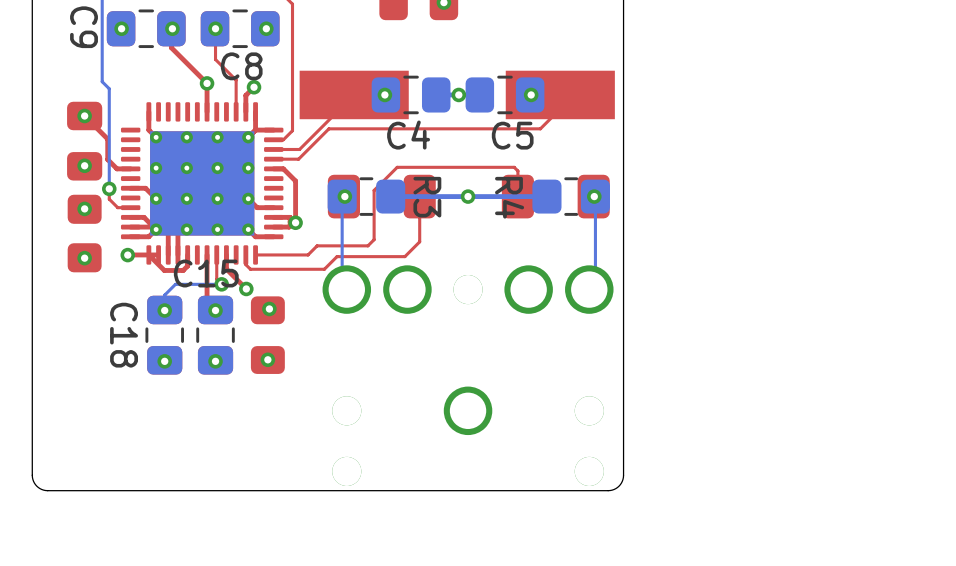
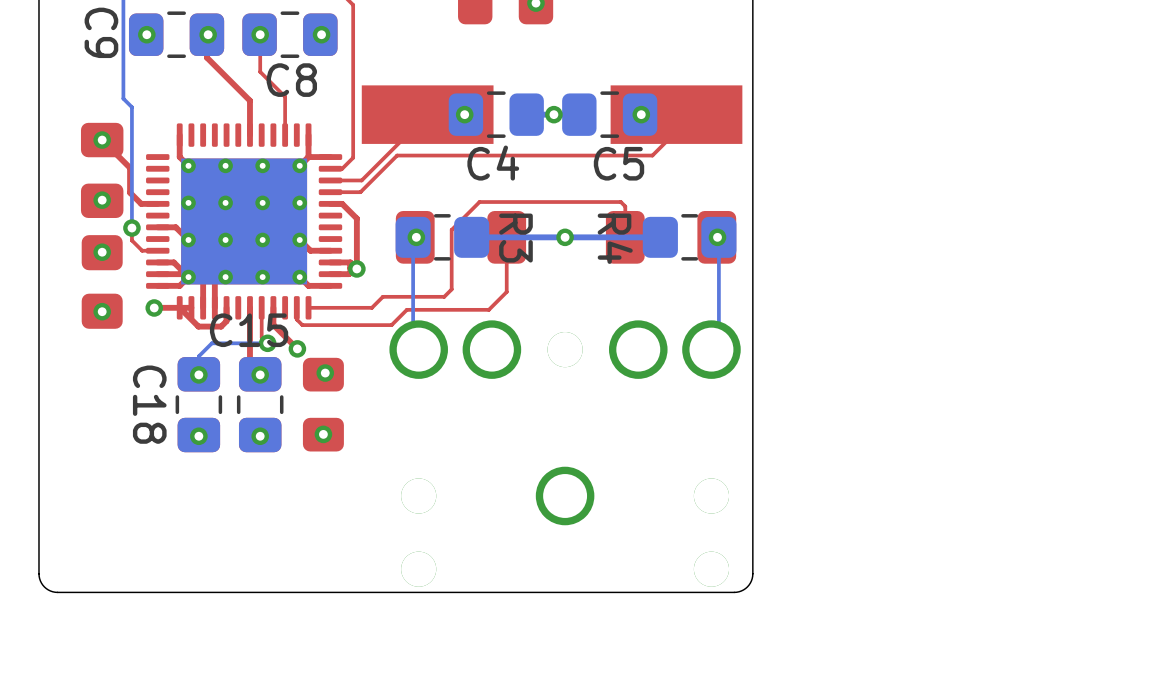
via: (207, 83) -> none
top track: (254, 87) (245, 95) (245, 111) -> none
via: (254, 87) -> none

